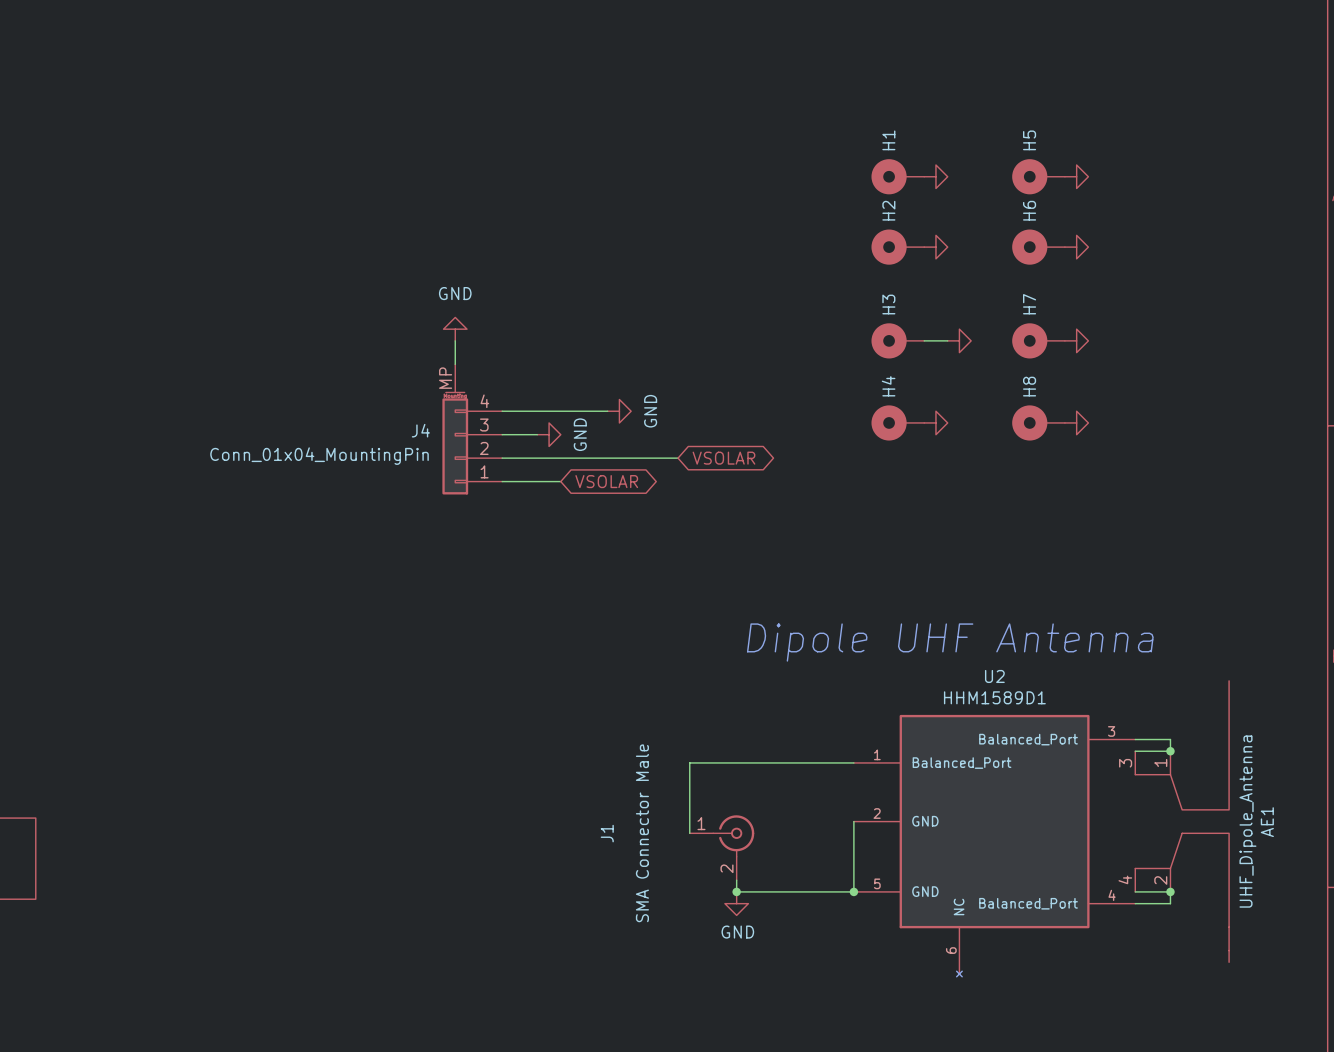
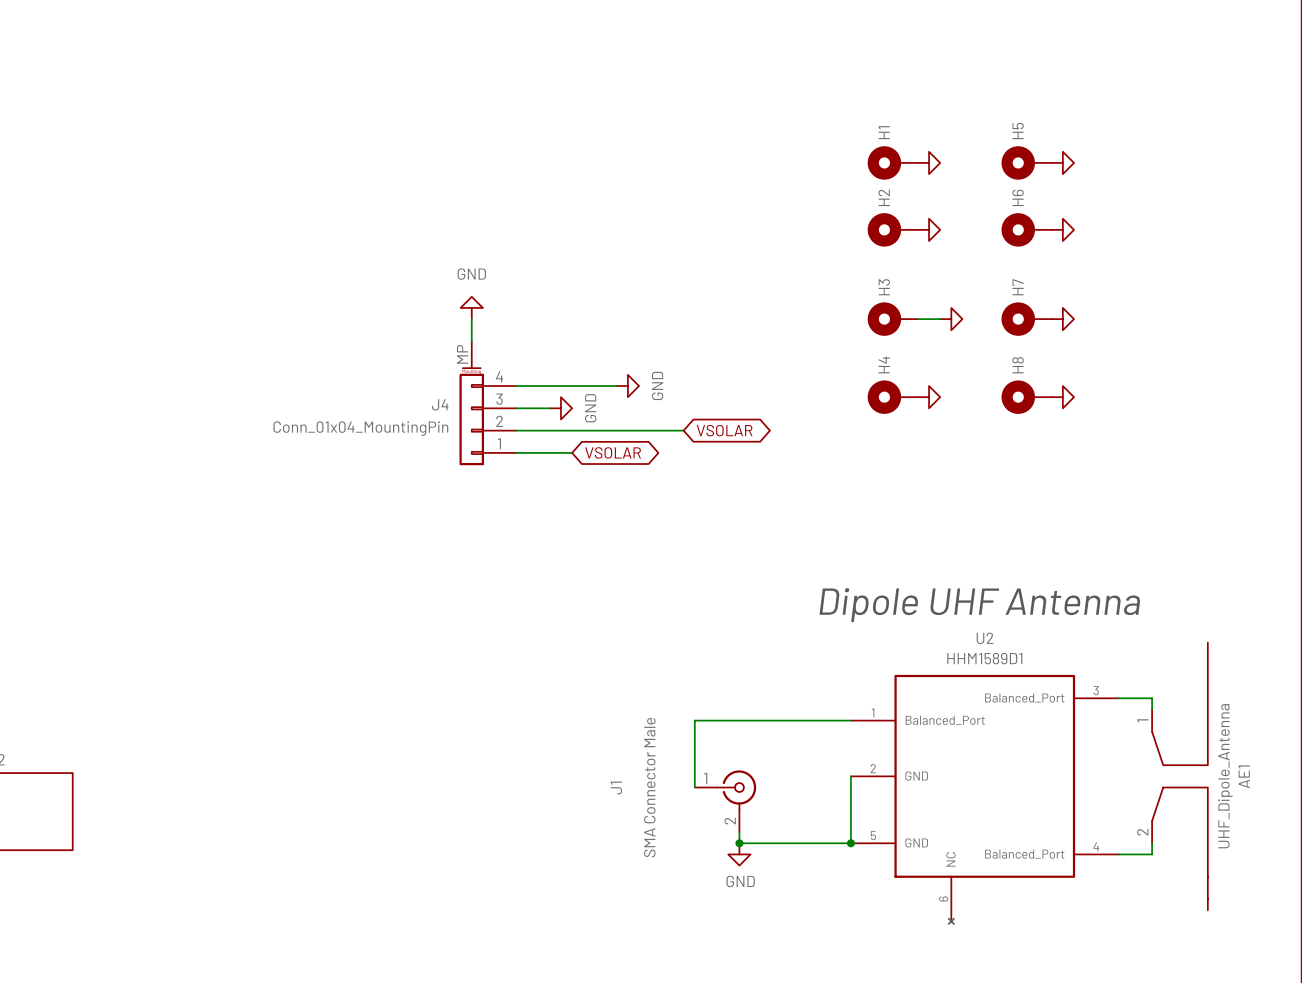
AE1 symbol: [1135, 680, 1230, 963] -> [1152, 642, 1208, 911]
wire: (1135, 751) (1170, 751) -> none
junction: (1170, 751) -> none
wire: (1135, 891) (1170, 891) -> none
junction: (1170, 891) -> none

